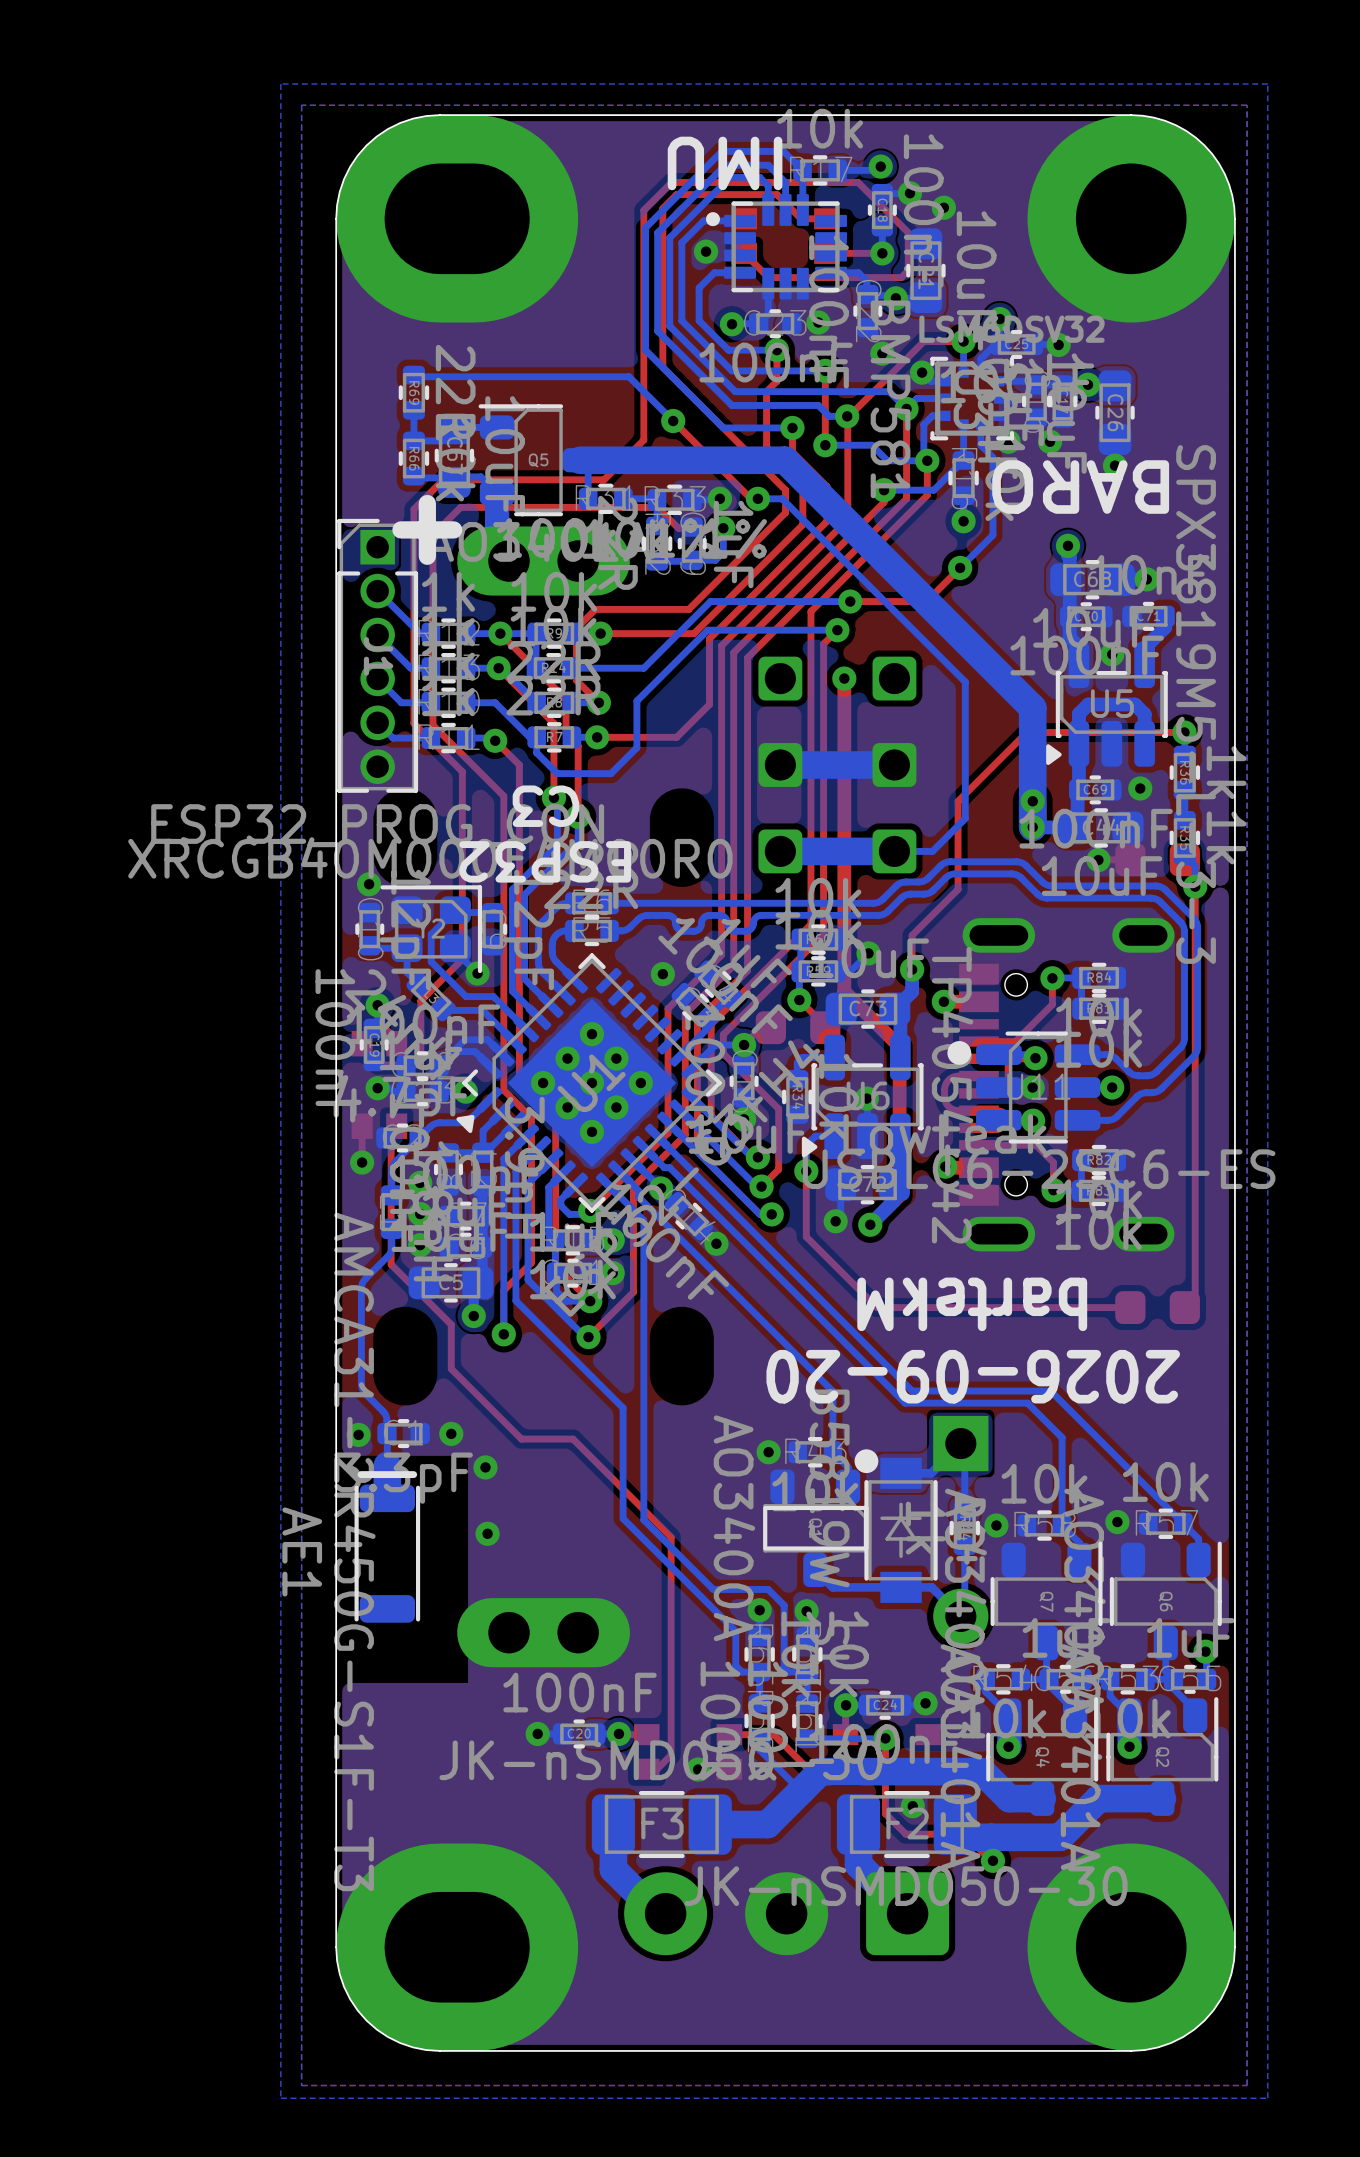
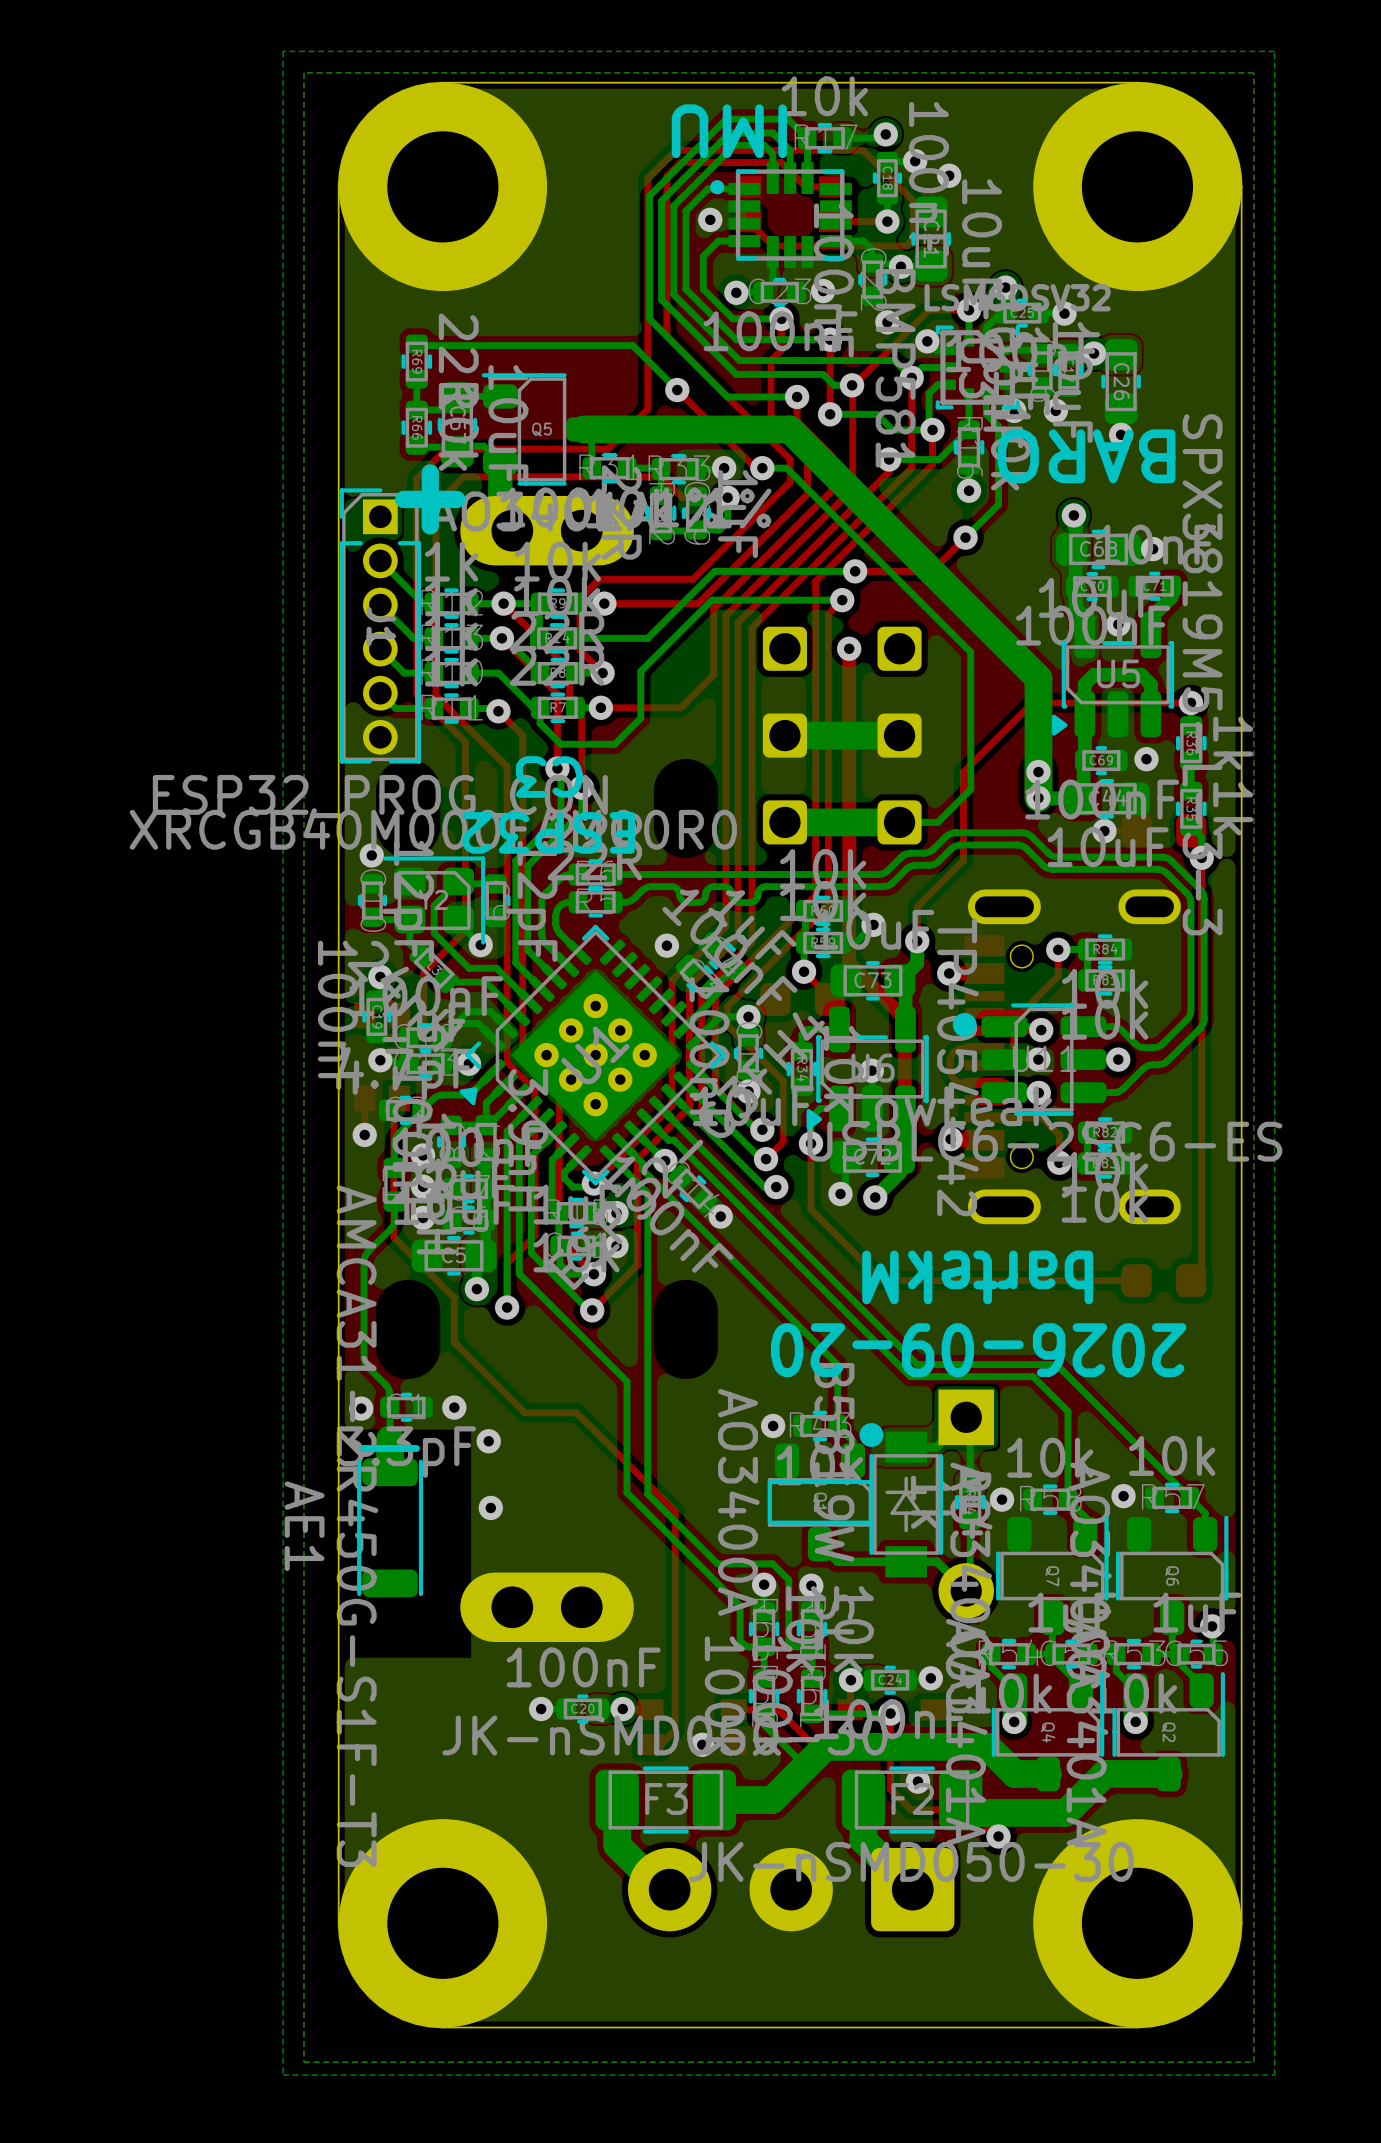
part footprint: [336, 115, 579, 323] -> [338, 82, 548, 292]
part footprint: [336, 1843, 579, 2051] -> [338, 1819, 548, 2028]

